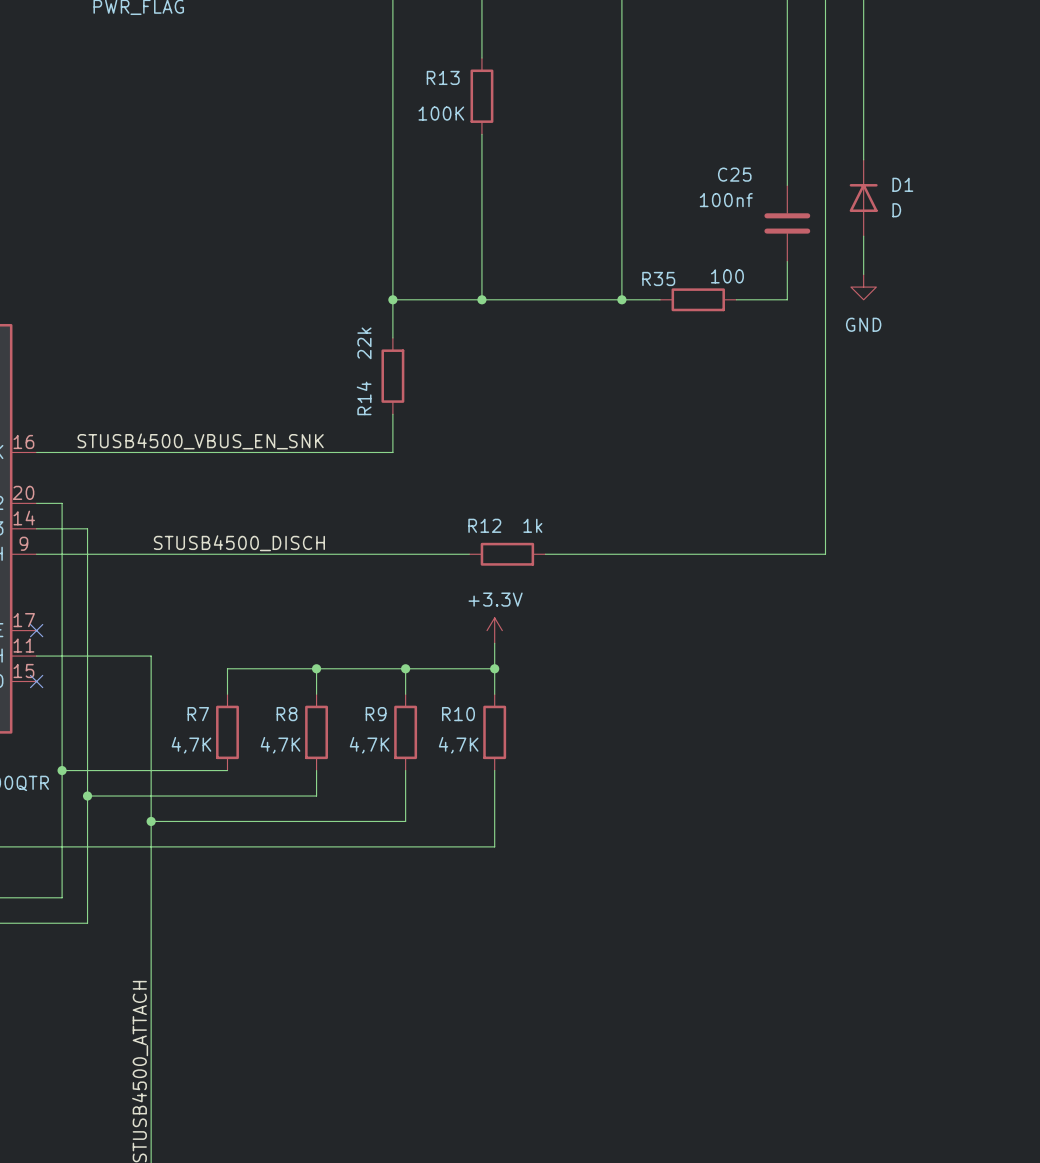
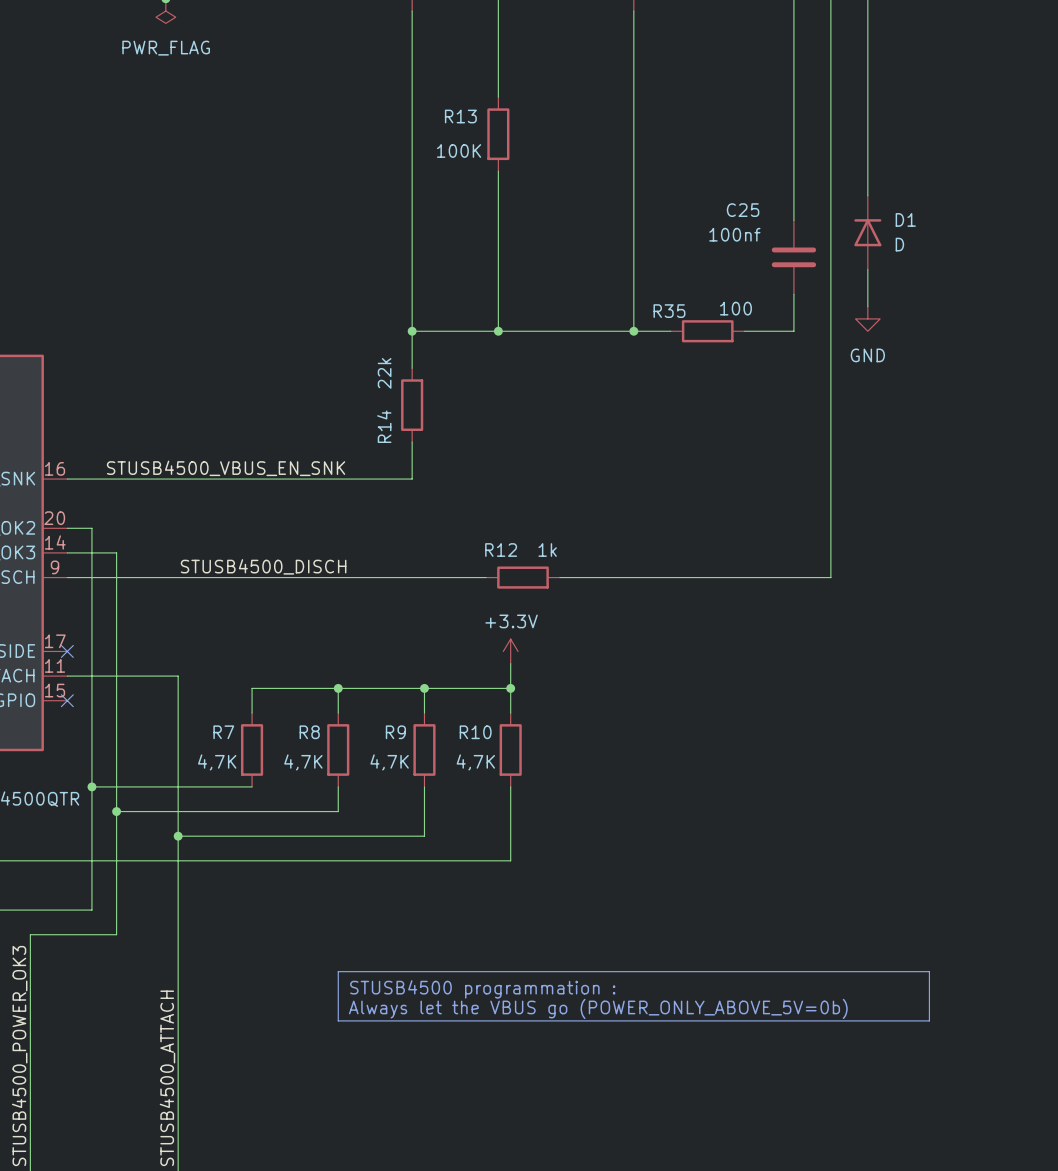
line: none -> (338, 971) (929, 971) (929, 1020) (338, 1020) (338, 971)
text: none -> STUSB4500 programmation : (482, 989)
text: none -> Always let the VBUS go (POWER_ONLY_ABOVE_5V=0b) (598, 1008)

